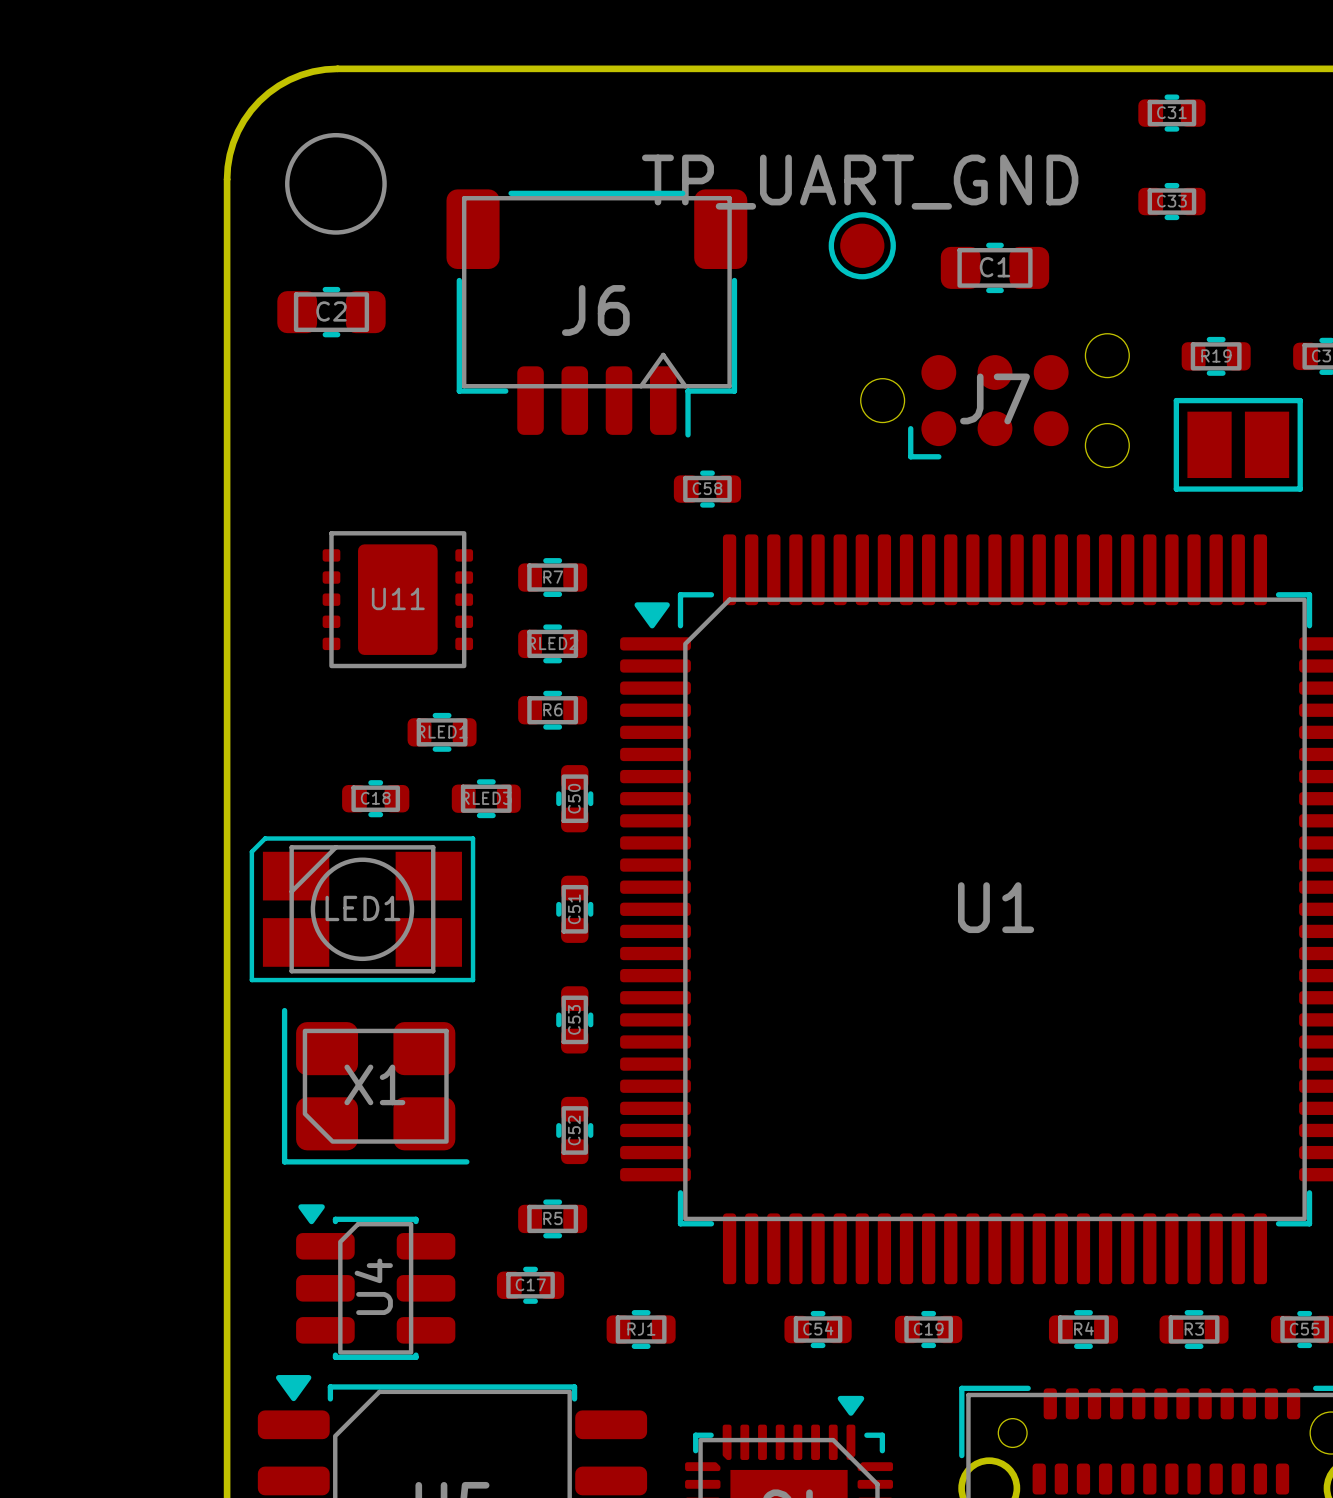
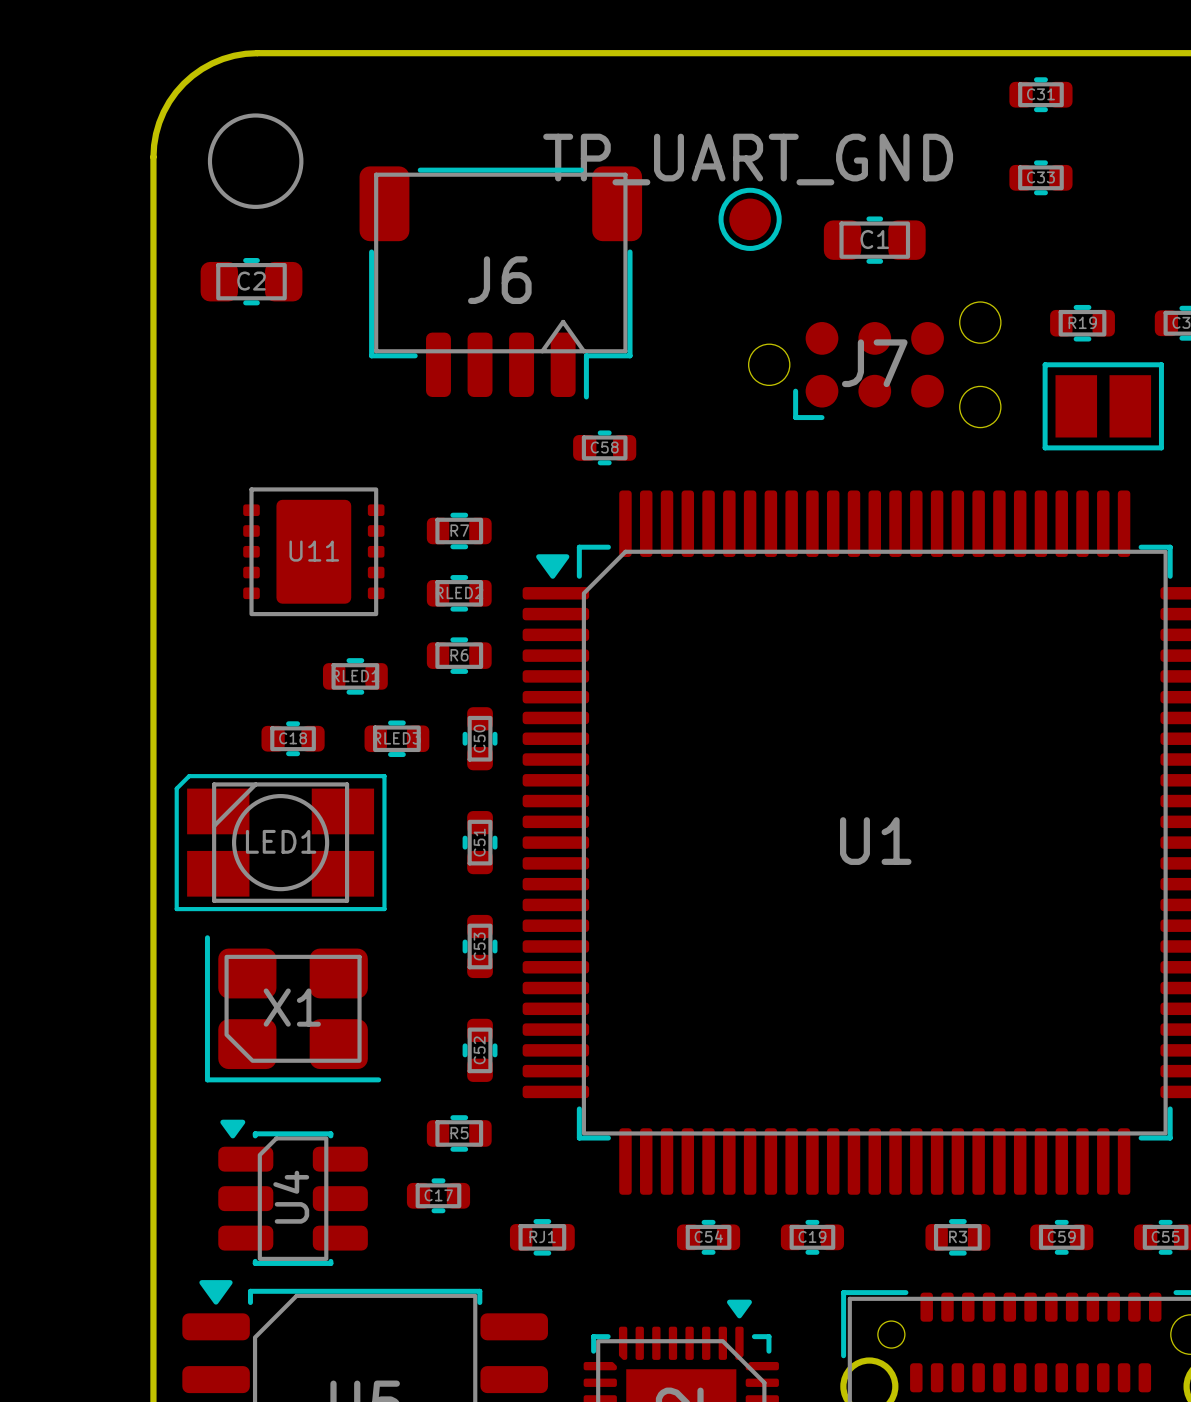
R4 name: R4 (1084, 1328) -> R3 (958, 1236)
R3: (1194, 1329) -> none
C59: none -> (1061, 1237)

